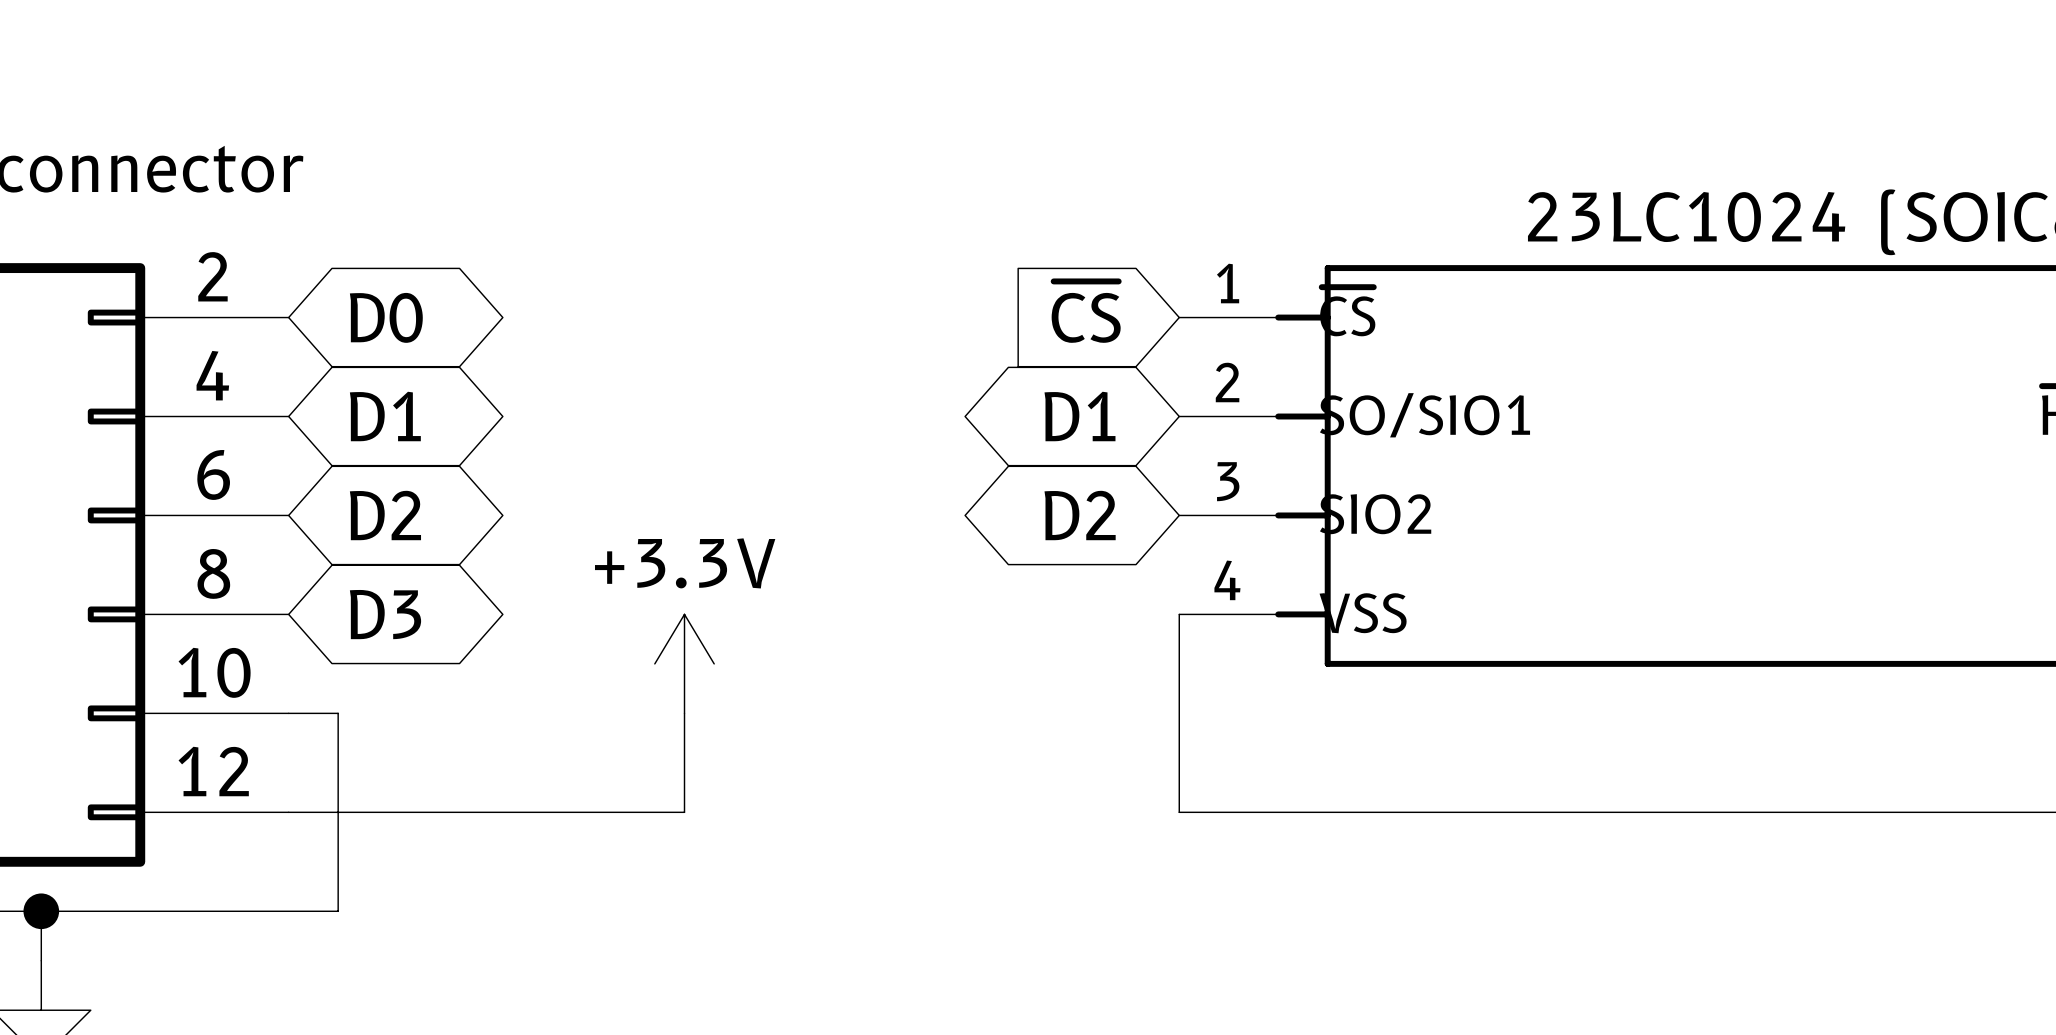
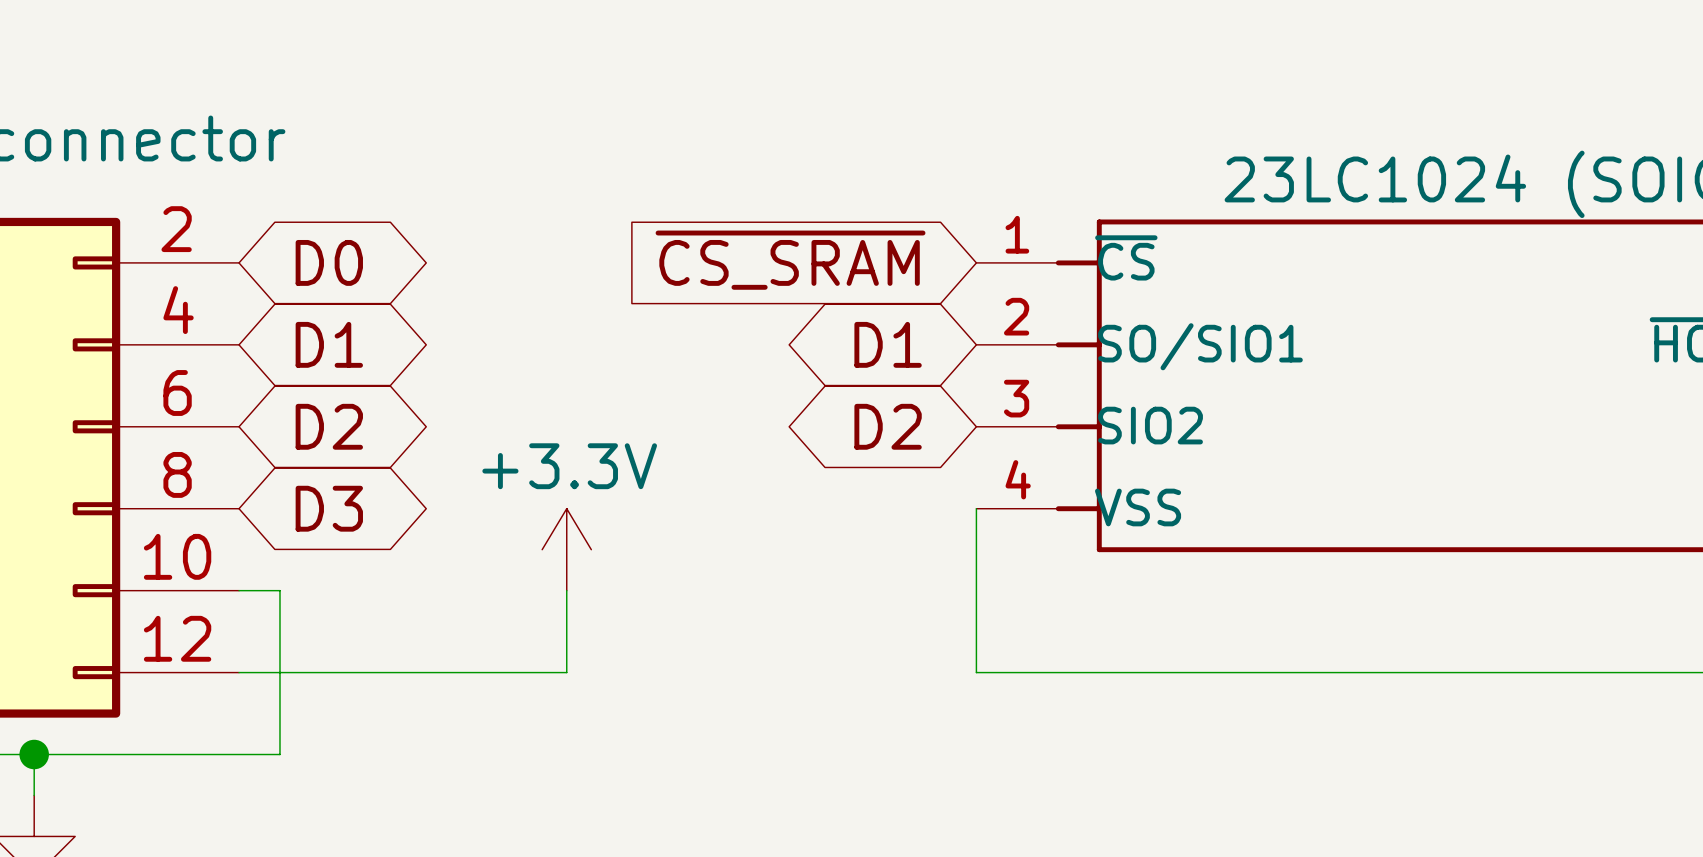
global label: ~{CS} (1086, 312) -> ~{CS_SRAM} (790, 260)

